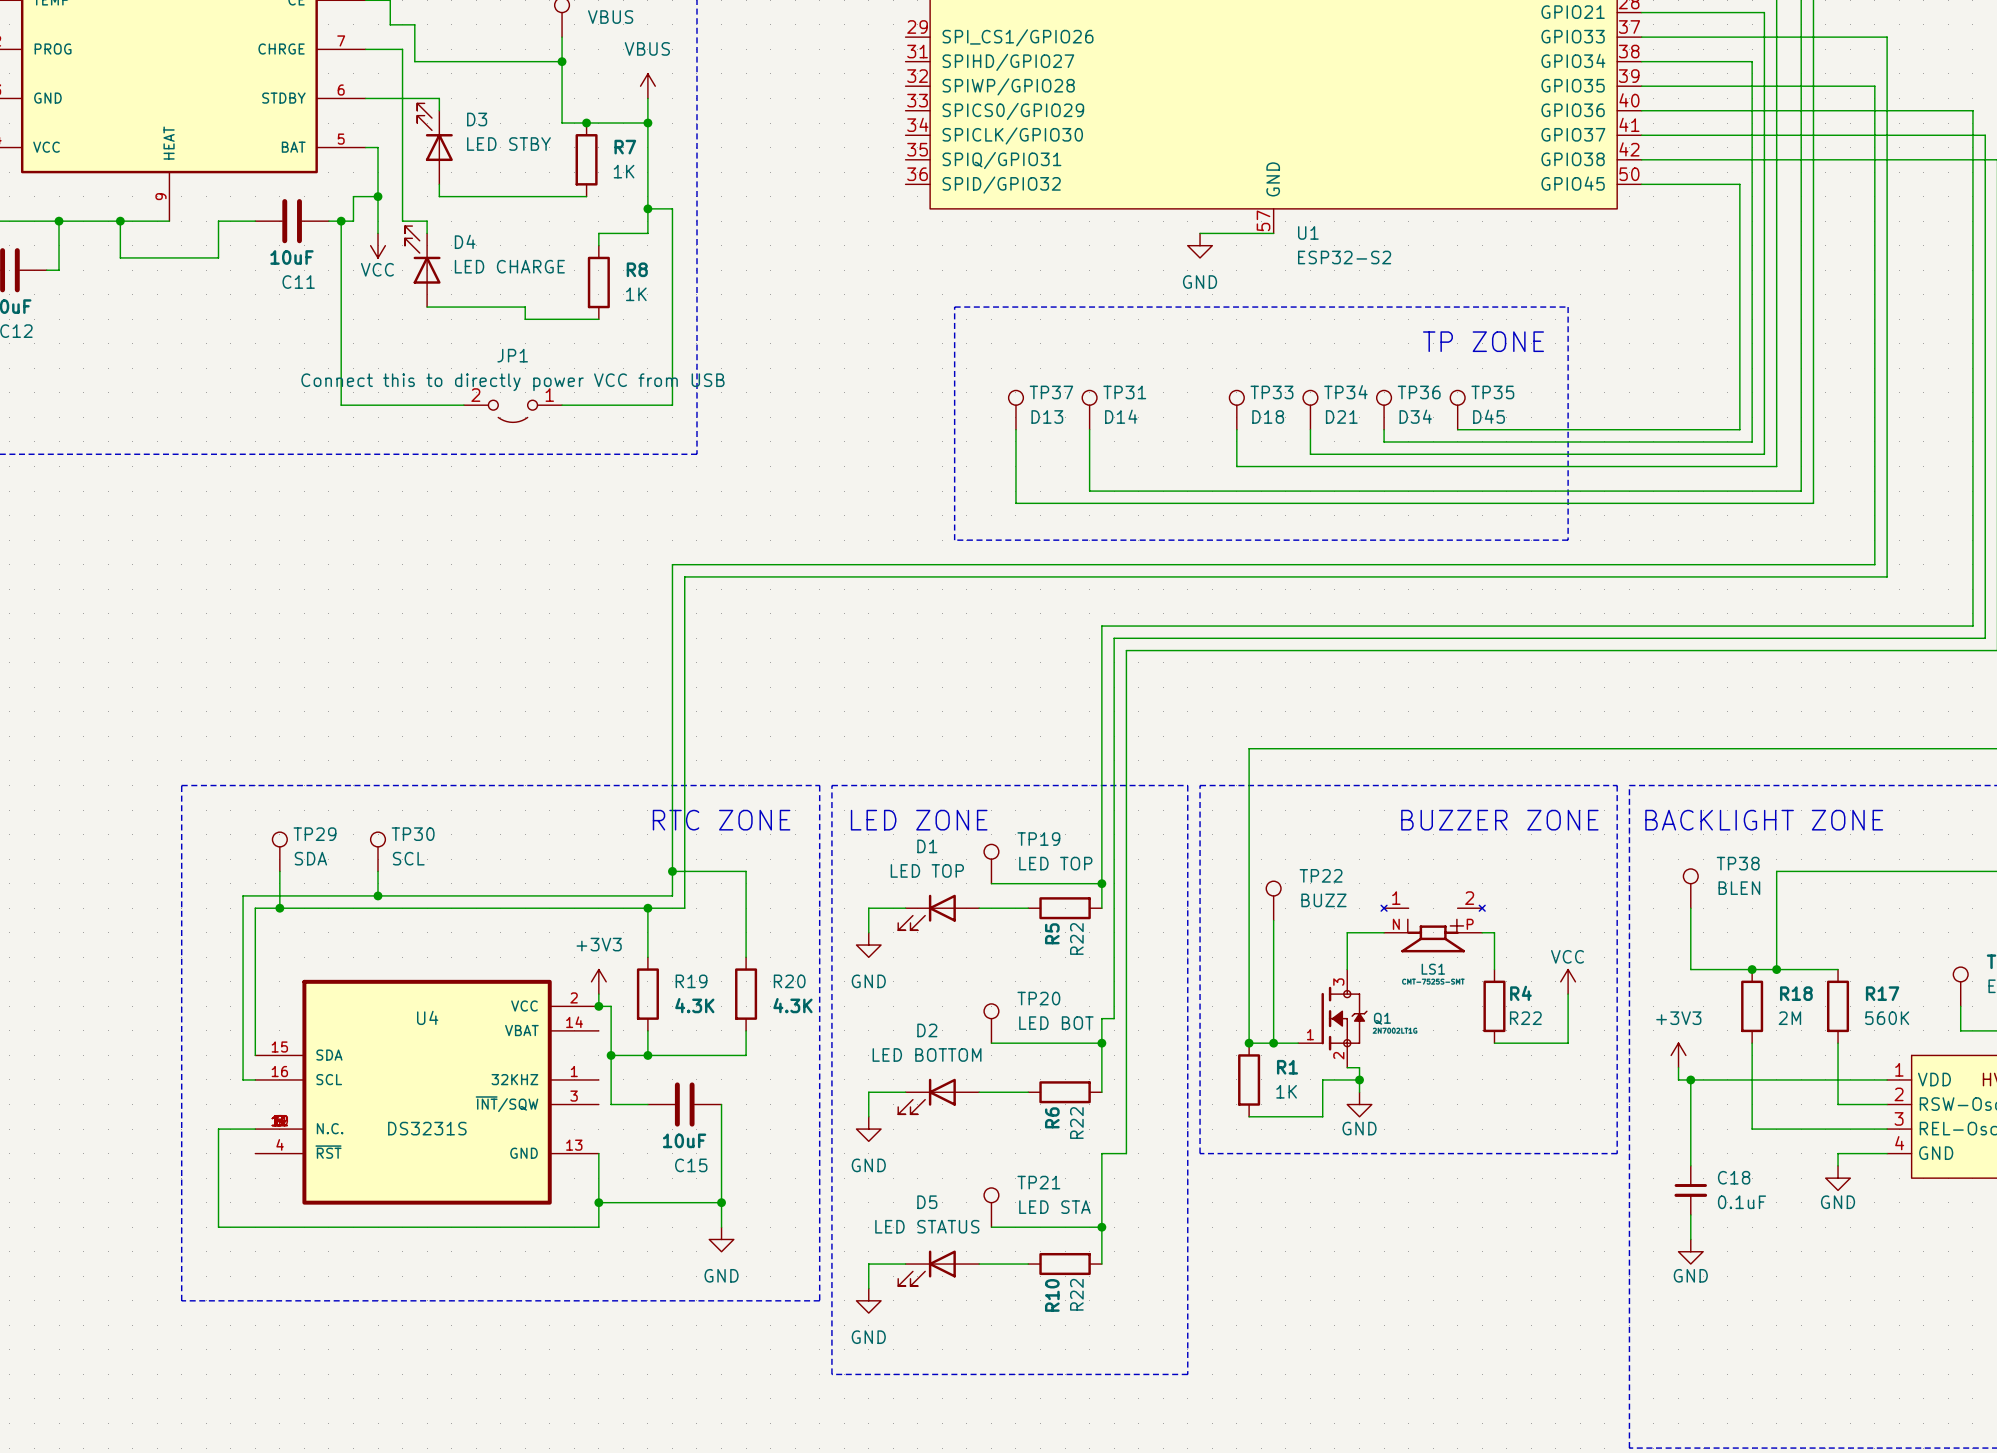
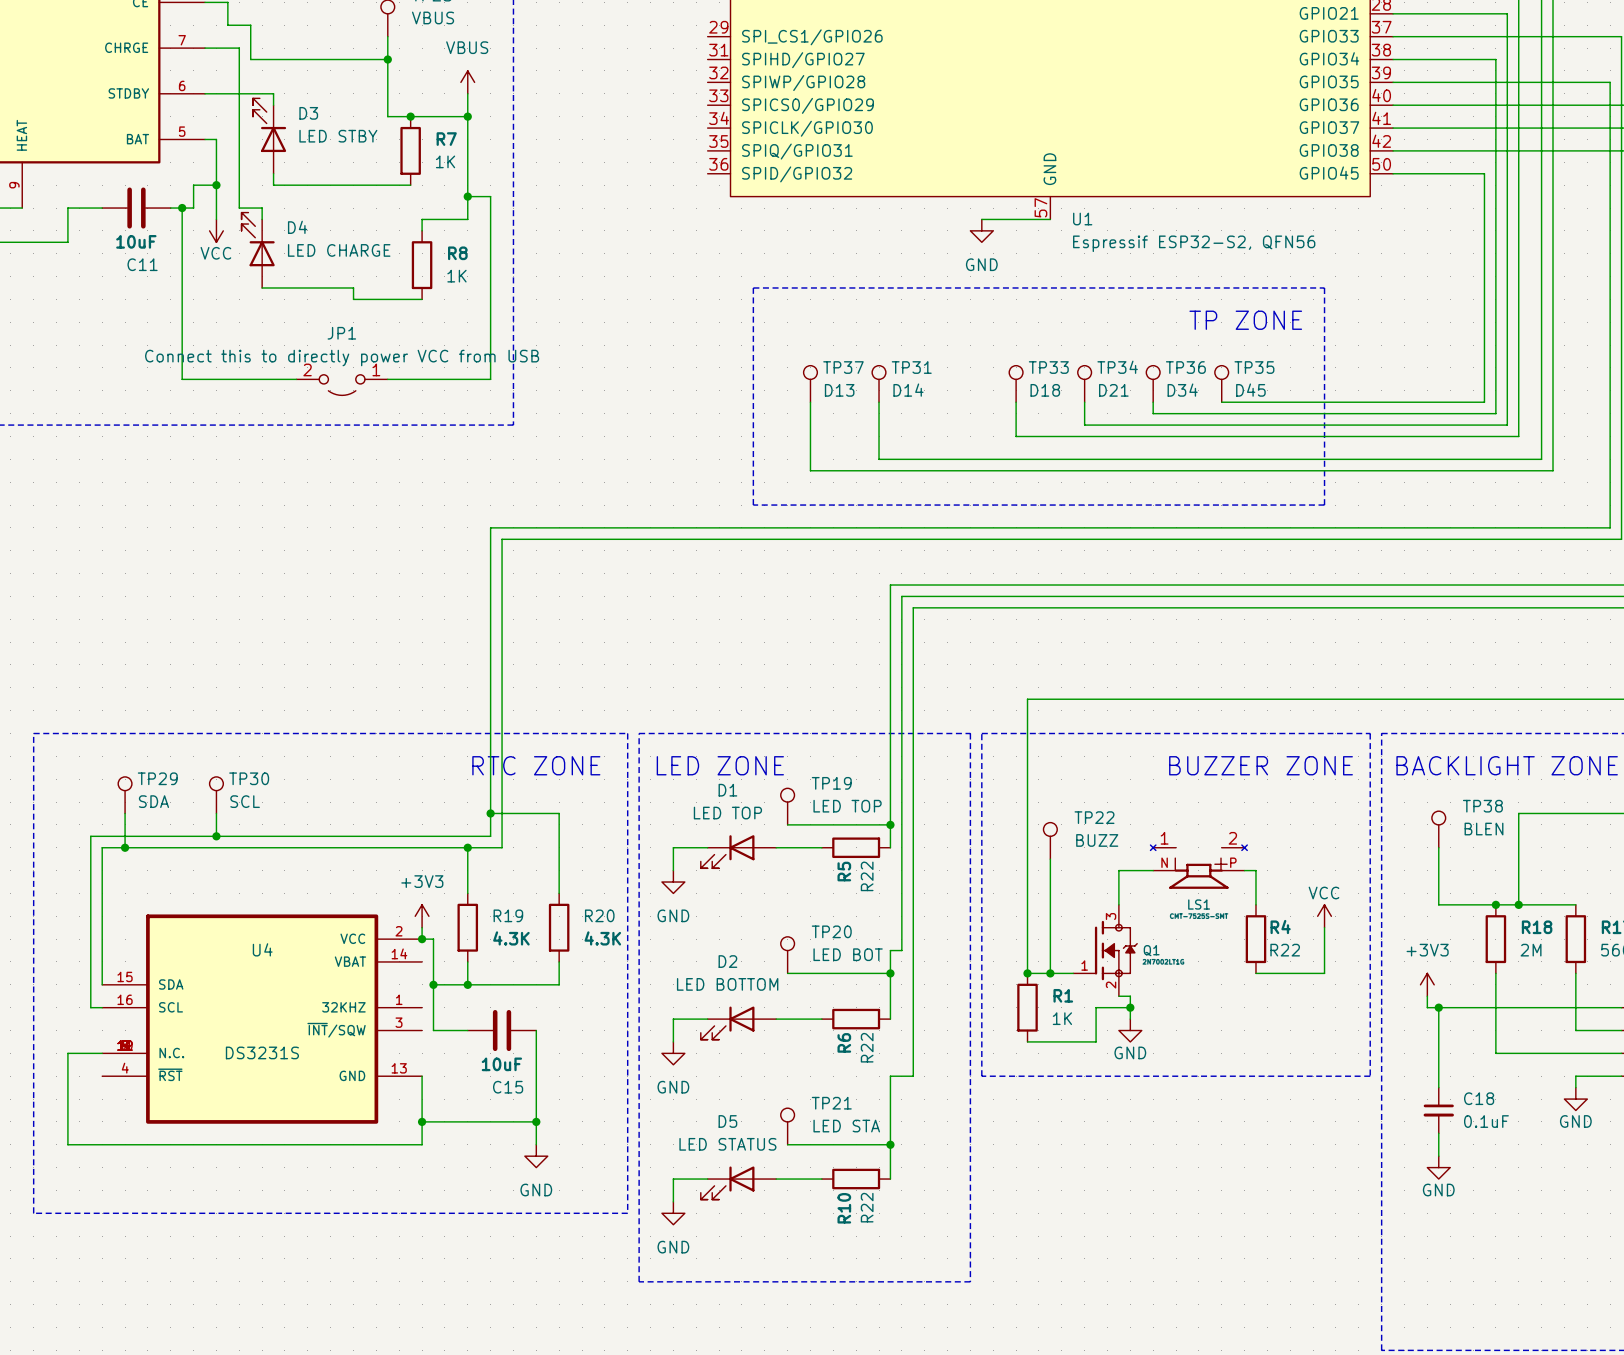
U1 value: ESP32-S2 (1344, 257) -> Espressif ESP32-S2, QFN56 (1194, 243)

